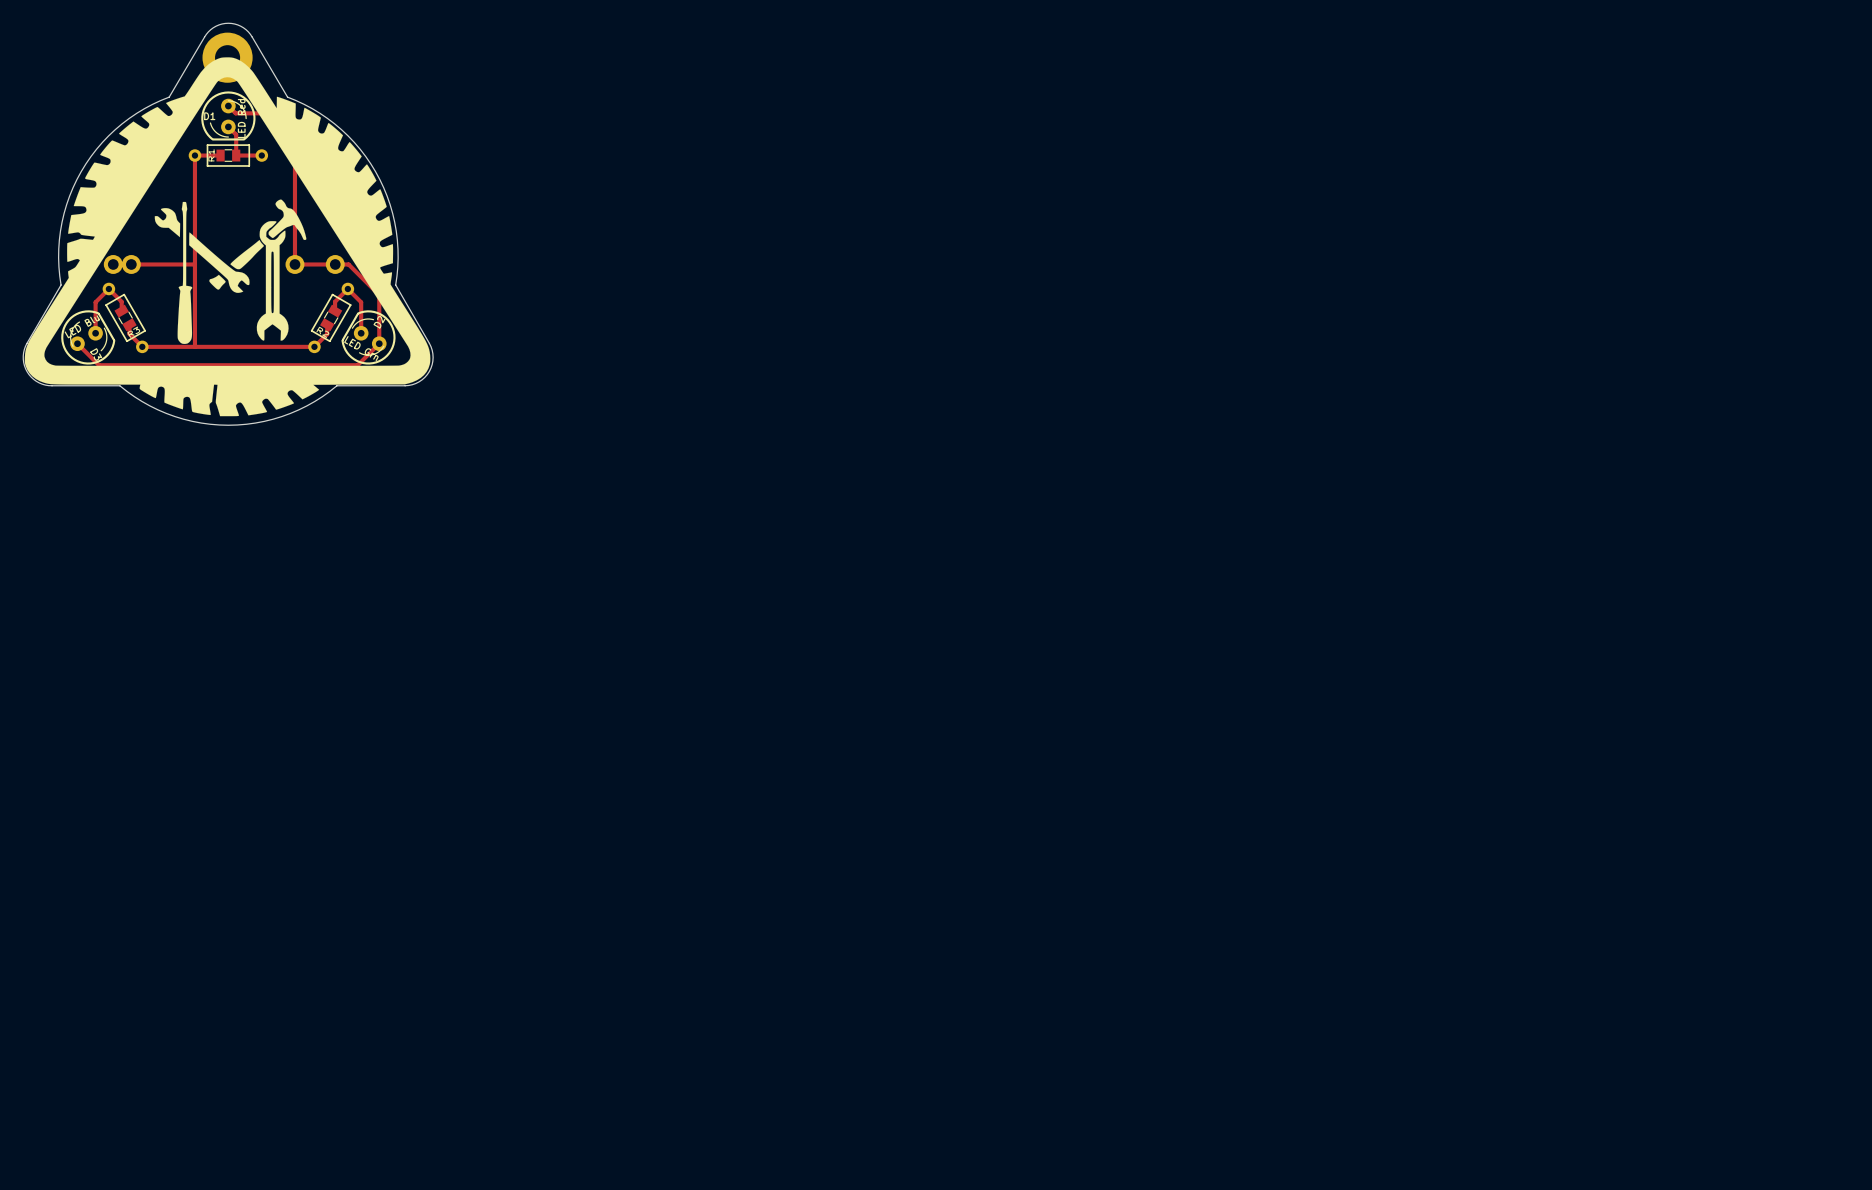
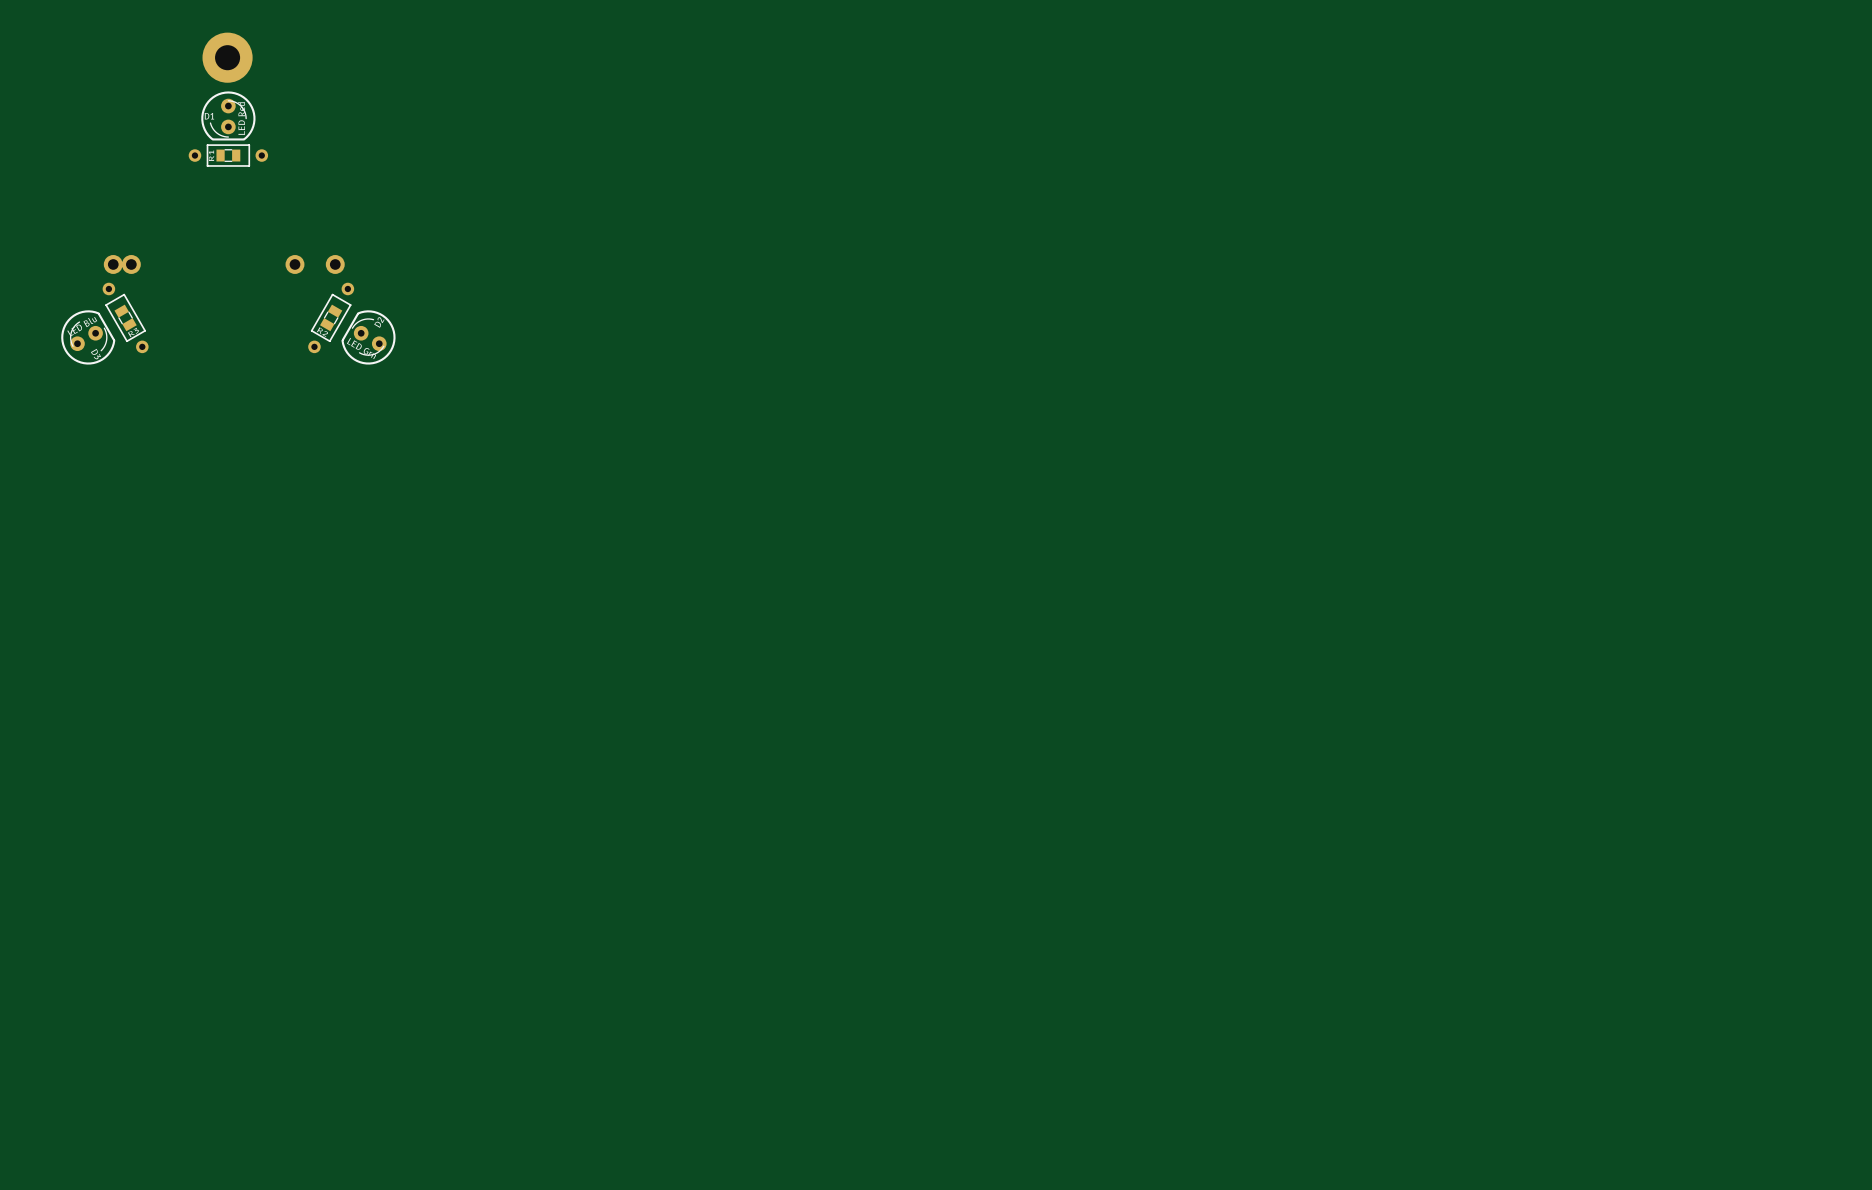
board edge: (204, 37) (169, 97) (144, 108) (115, 129) (96, 149) (76, 179) (66, 204) (60, 231) (58, 258) (61, 285) (25, 346) (23, 359) (27, 371) (36, 381) (48, 385) (119, 385) (149, 405) (174, 416) (201, 423) (228, 425) (255, 423) (281, 416) (314, 401) (336, 385) (405, 385) (419, 381) (430, 368) (432, 350) (395, 285) (397, 249) (394, 222) (387, 196) (370, 163) (354, 142) (334, 123) (312, 108) (287, 97) (246, 29) (234, 24) (225, 23) (213, 27) (204, 37) -> none
drawing: [24, 57, 431, 417] -> none
track: (228, 106) (235, 113) (262, 113) (294, 146) (294, 264) (348, 264) (379, 295) (379, 343) (357, 365) (99, 365) (77, 343) -> none
track: (228, 126) (236, 134) (236, 155) (261, 155) -> none
track: (220, 155) (194, 155) (195, 346) -> none
track: (113, 264) (194, 264) -> none
track: (121, 311) (121, 301) (108, 288) (95, 302) (95, 333) -> none
track: (335, 311) (335, 301) (347, 288) (361, 302) (361, 333) -> none
track: (129, 324) (129, 334) (142, 346) (314, 346) (327, 334) (327, 324) -> none

